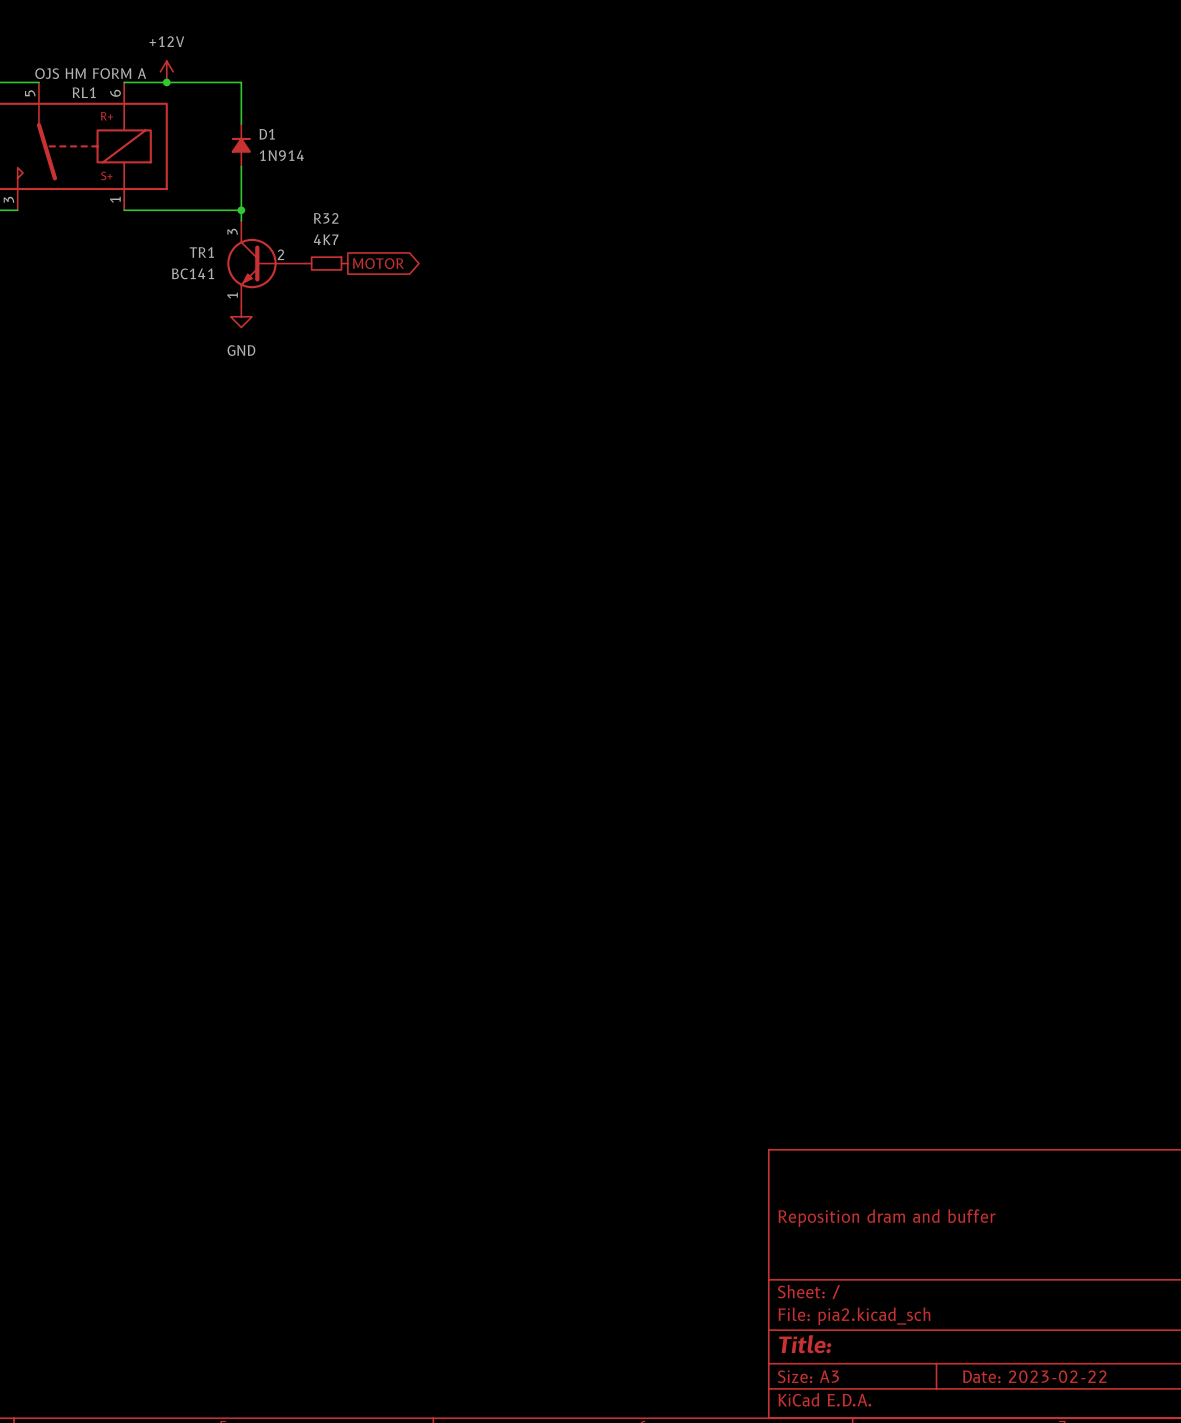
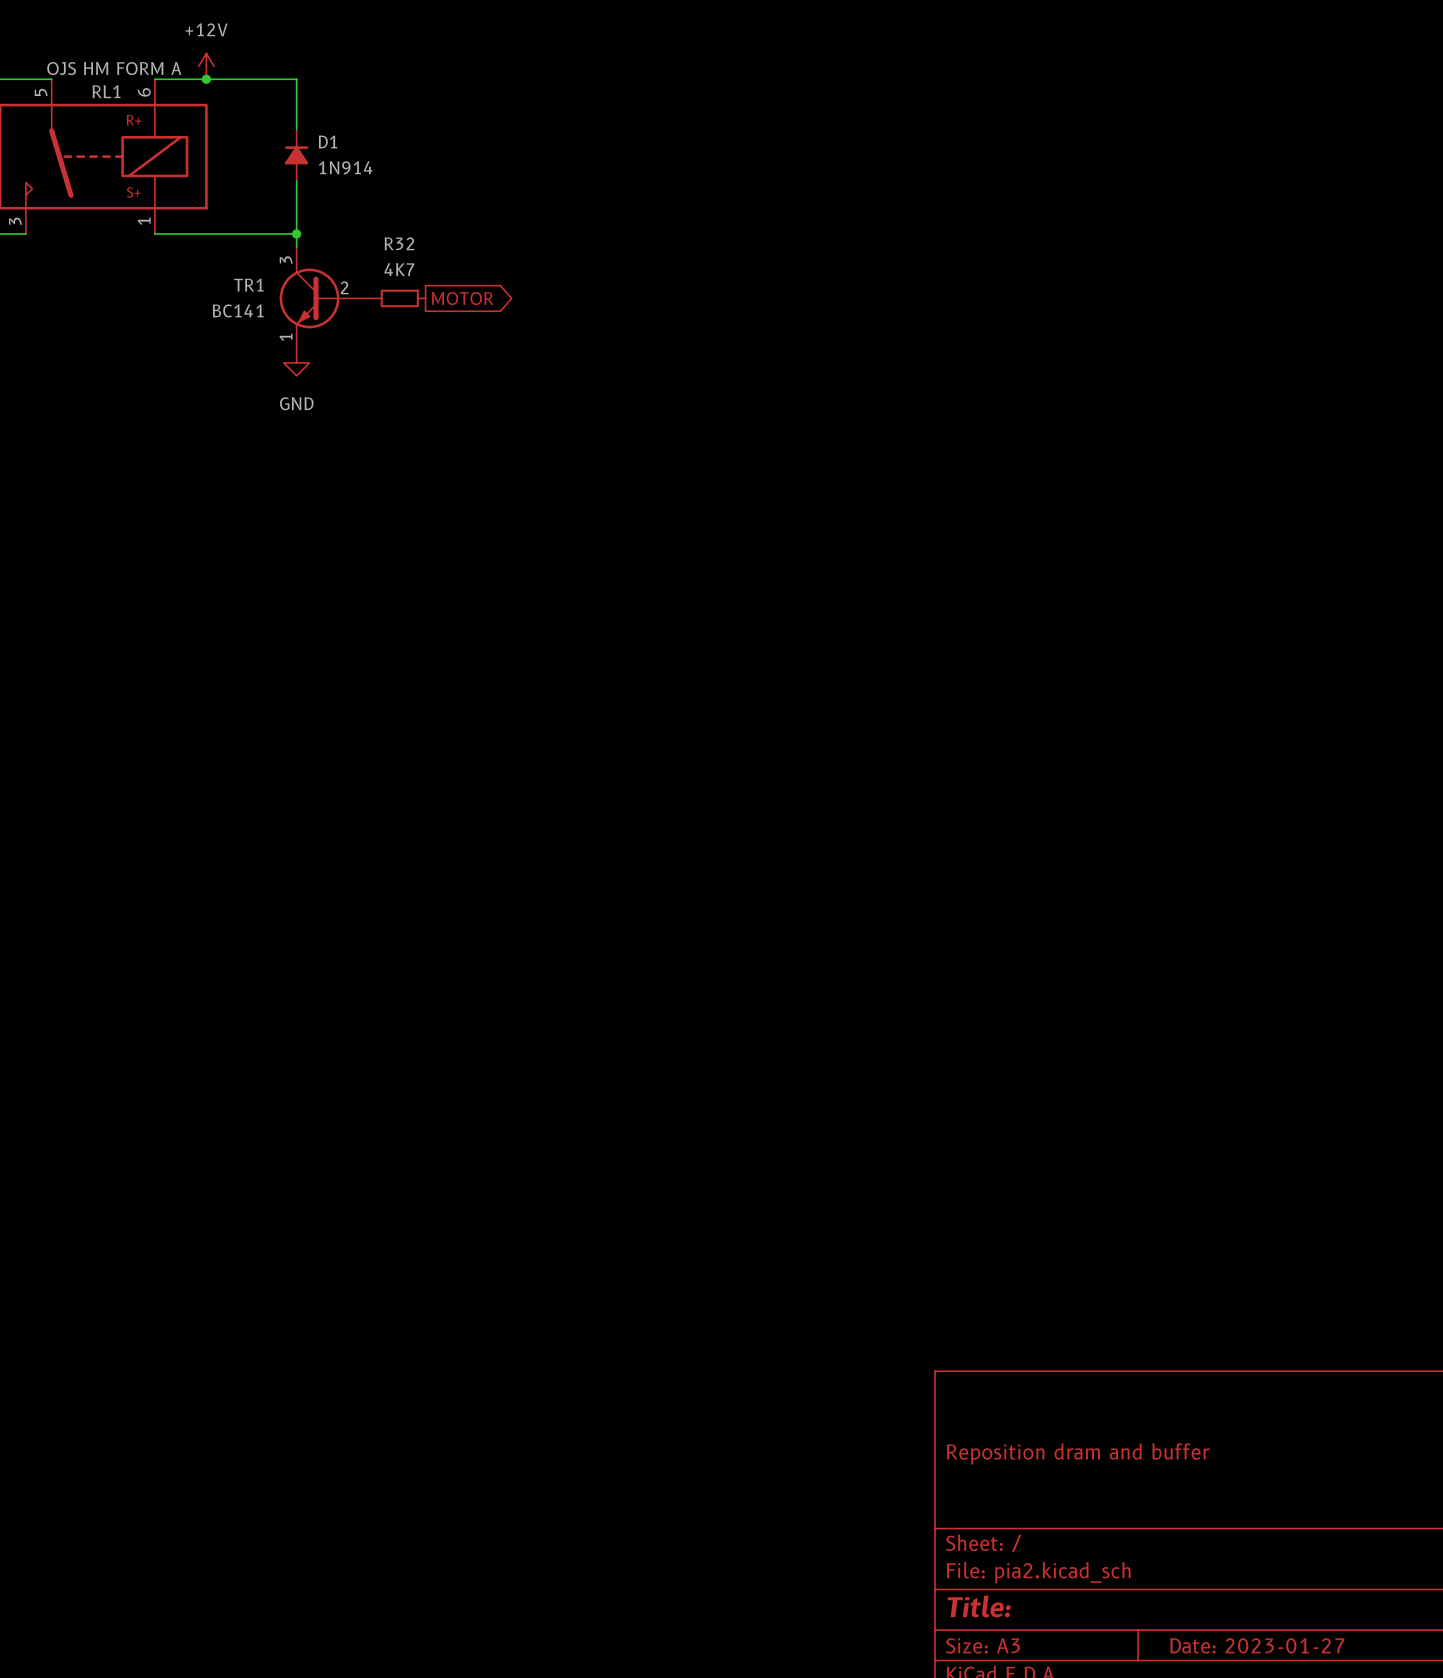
title block: Date: 2023-02-22 (1034, 1376) -> Date: 2023-01-27 (1257, 1645)

